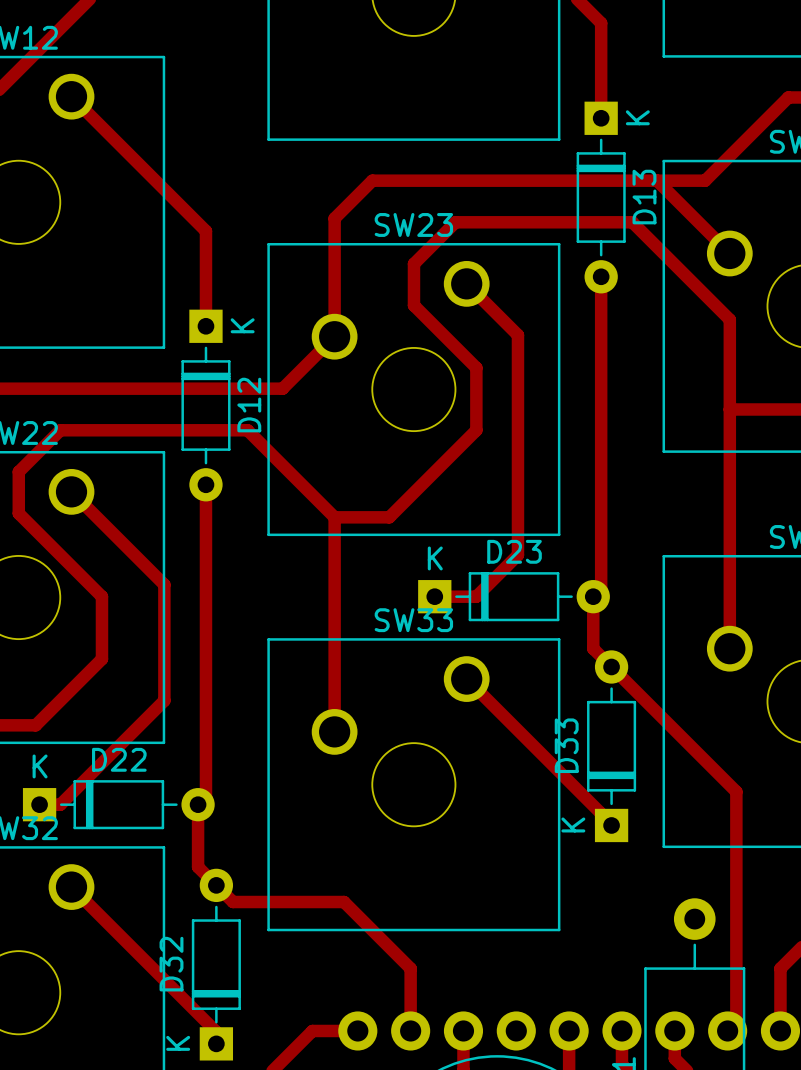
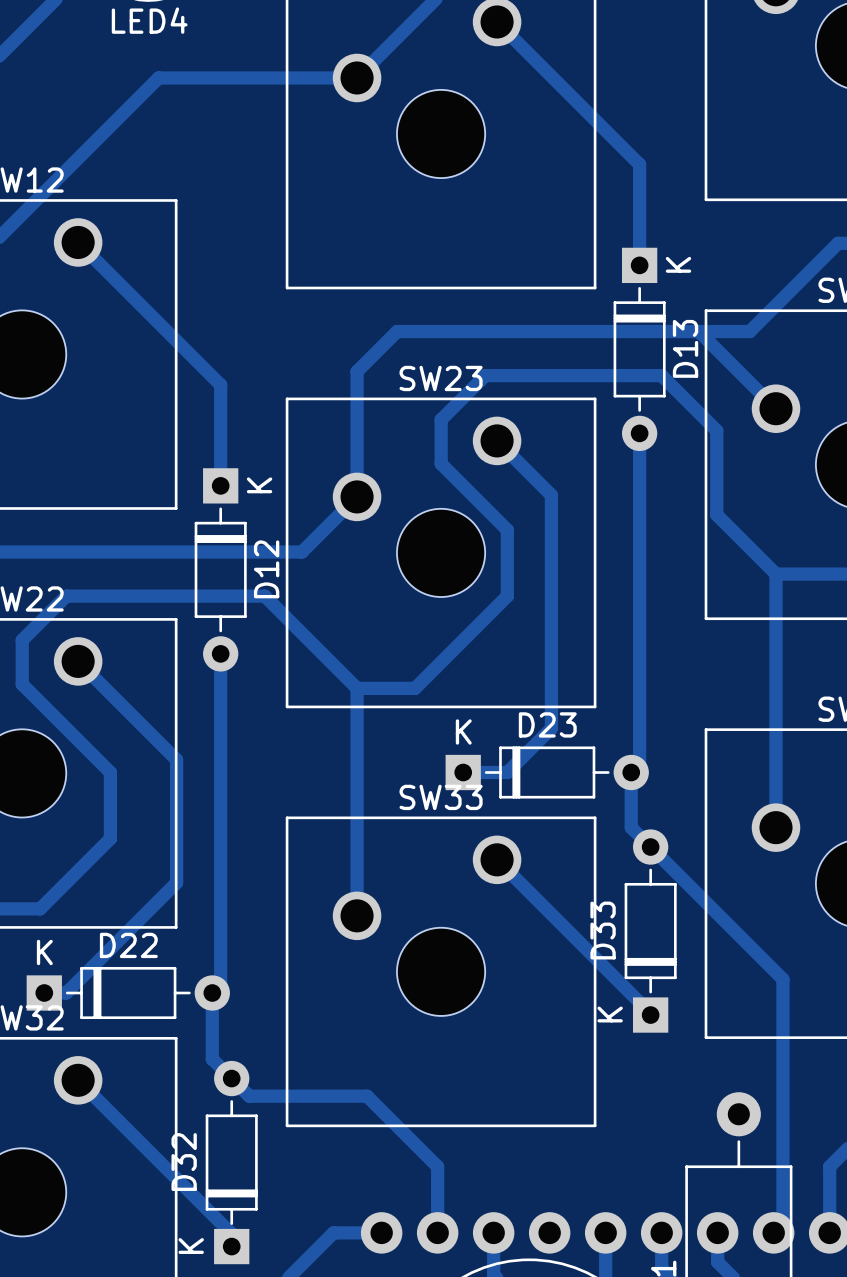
track: (621, 222) (632, 222) (729, 319) (729, 409) -> (661, 375) (716, 430) (716, 514) (775, 574)

